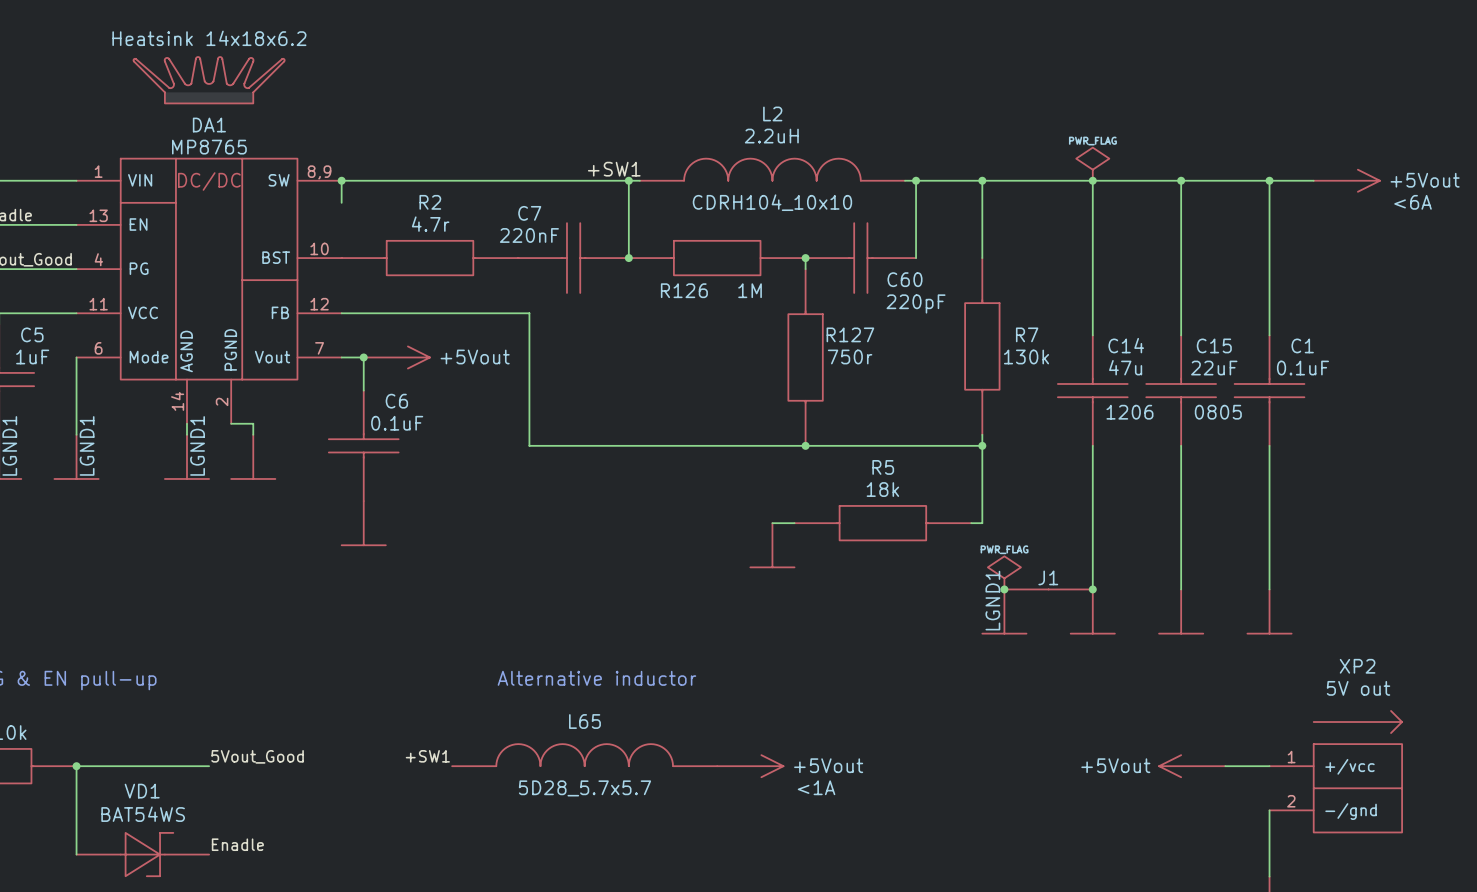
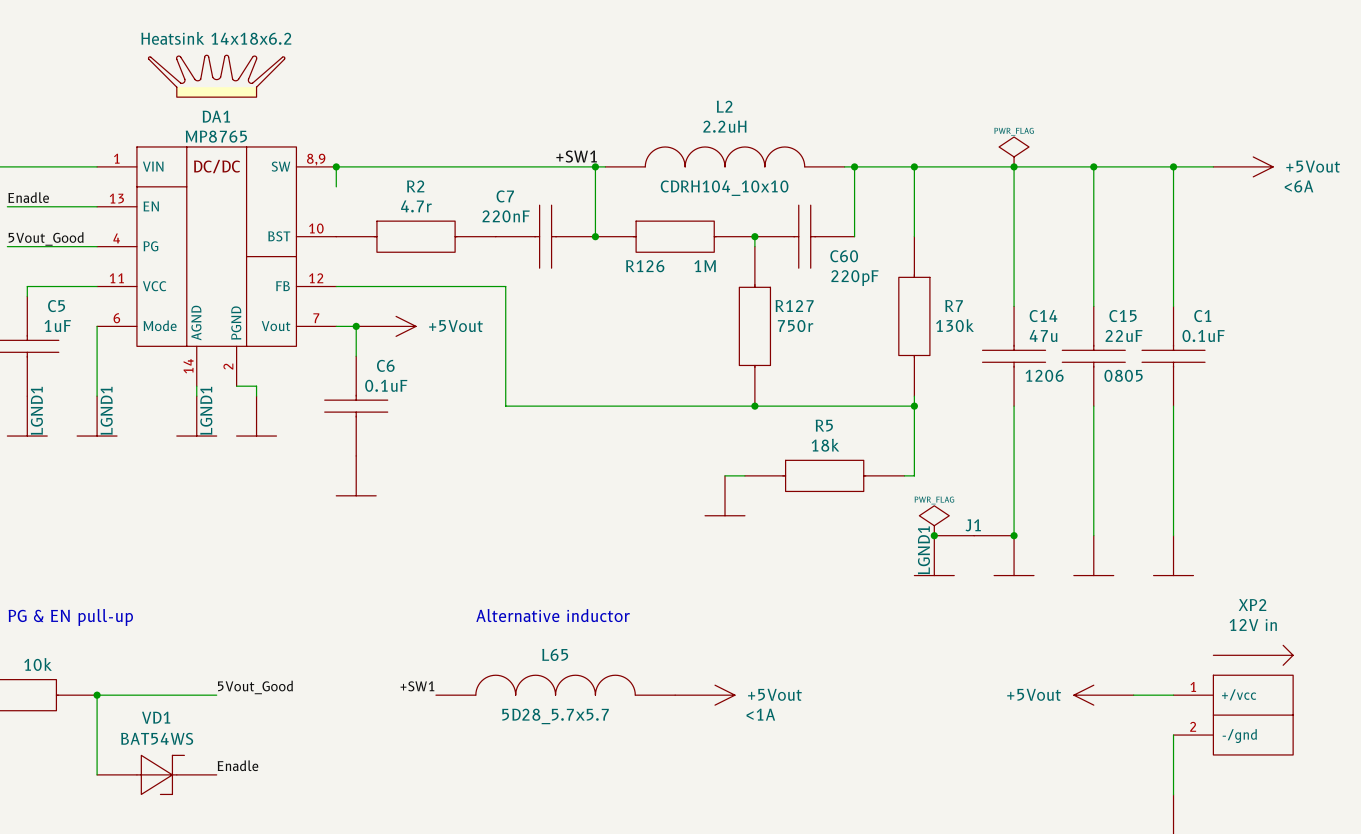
XP2 value: 5V out (1358, 688) -> 12V in (1253, 625)

